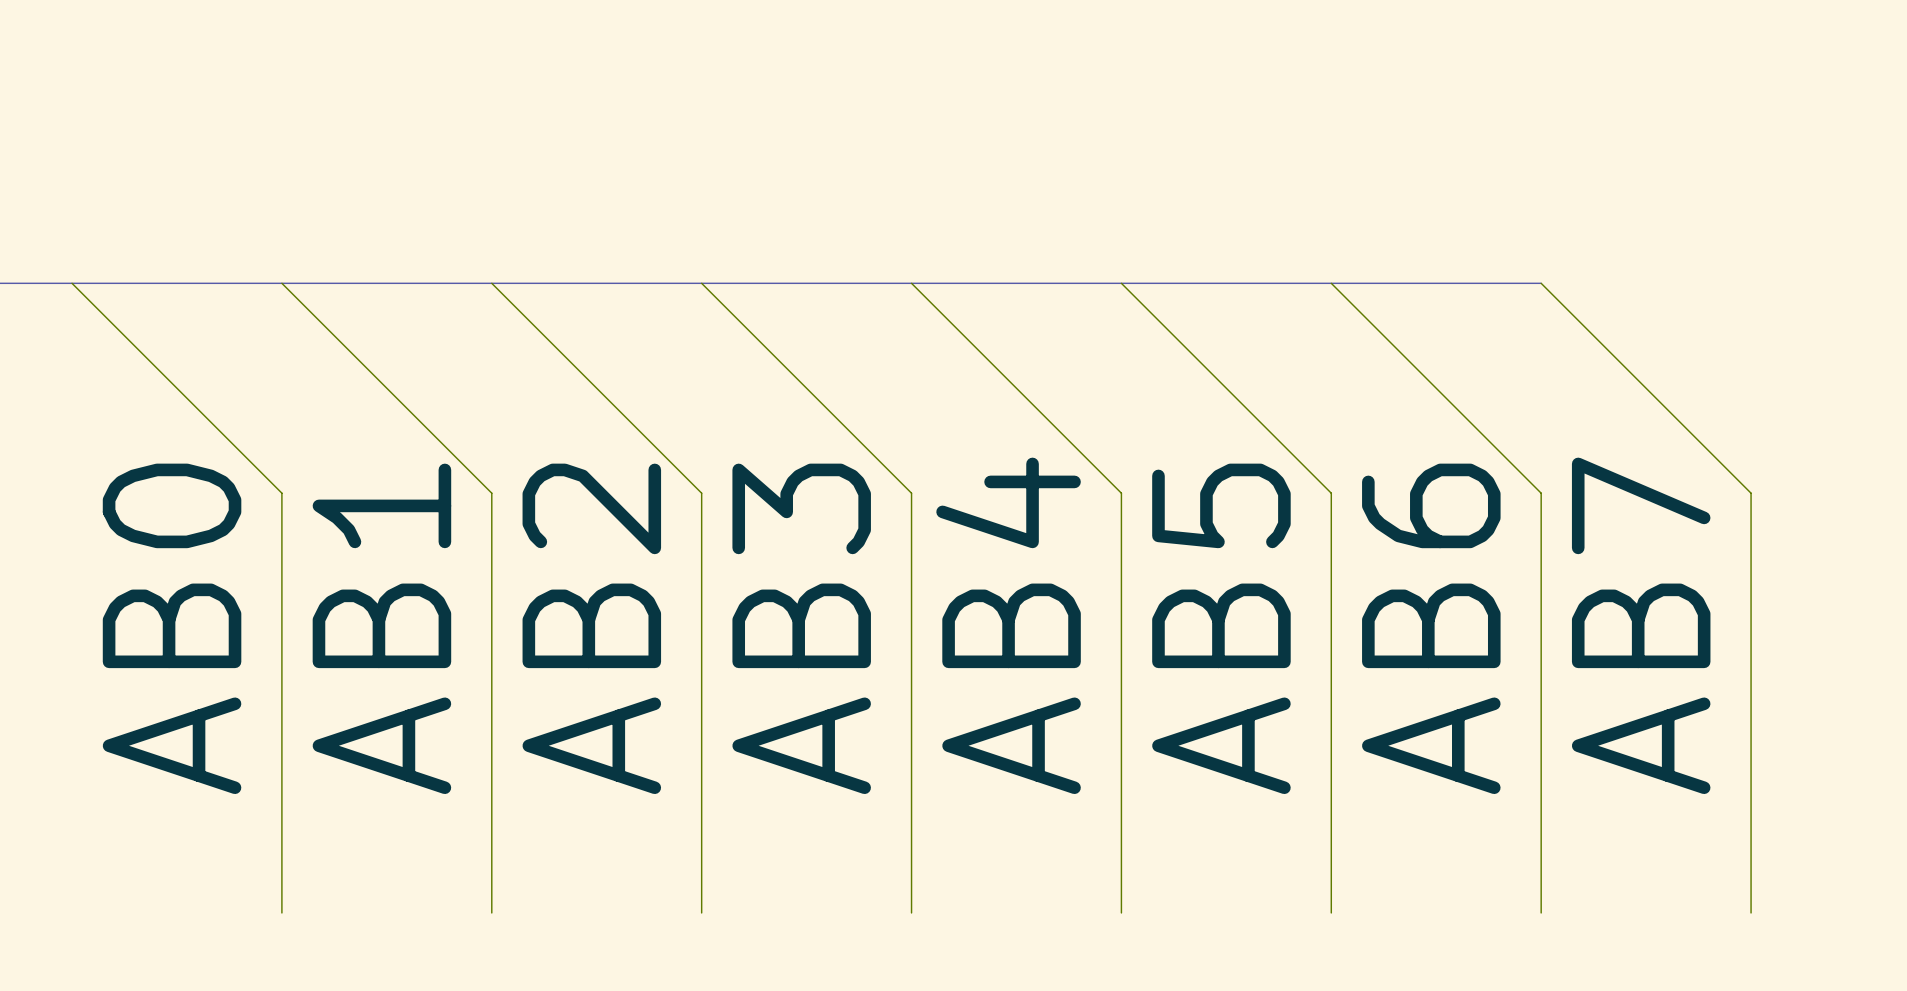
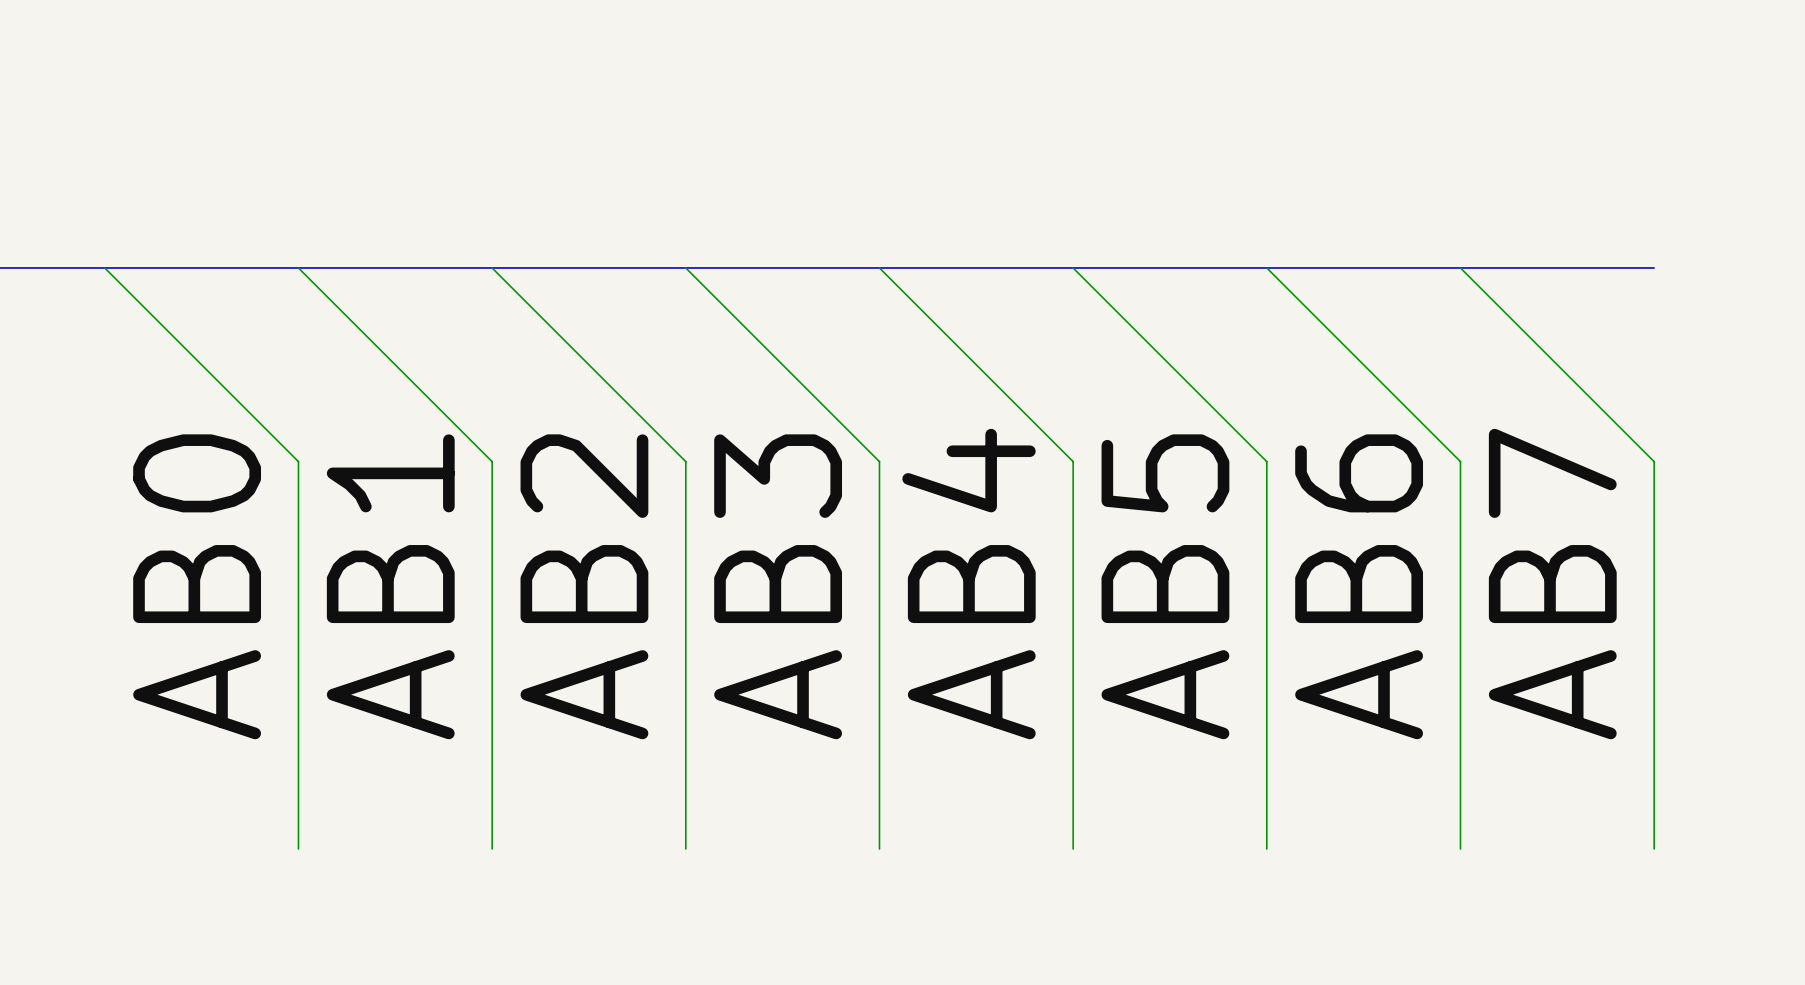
bus: none -> (1460, 267) (1654, 267)

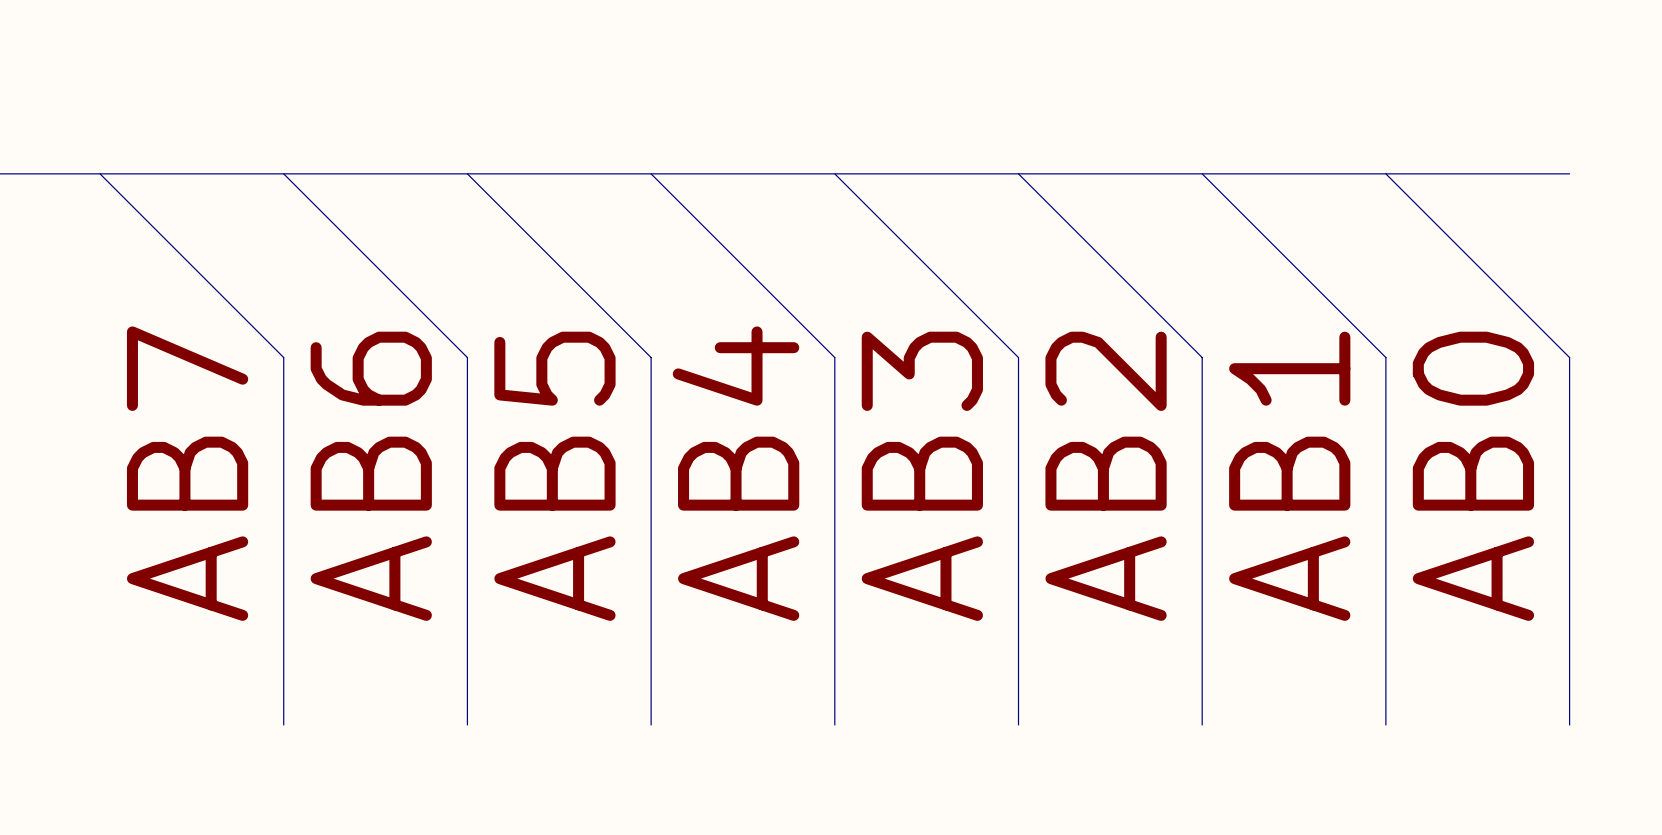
label: AB4 (969, 584) -> AB3 (922, 476)
label: AB7 (1552, 584) -> AB0 (1473, 476)
label: AB0 (197, 586) -> AB7 (187, 473)
label: AB1 (390, 586) -> AB6 (371, 476)
label: AB2 (584, 586) -> AB5 (554, 476)
label: AB3 (778, 586) -> AB4 (736, 473)
label: AB5 (1165, 586) -> AB2 (1106, 476)
label: AB6 (1359, 586) -> AB1 (1289, 476)

